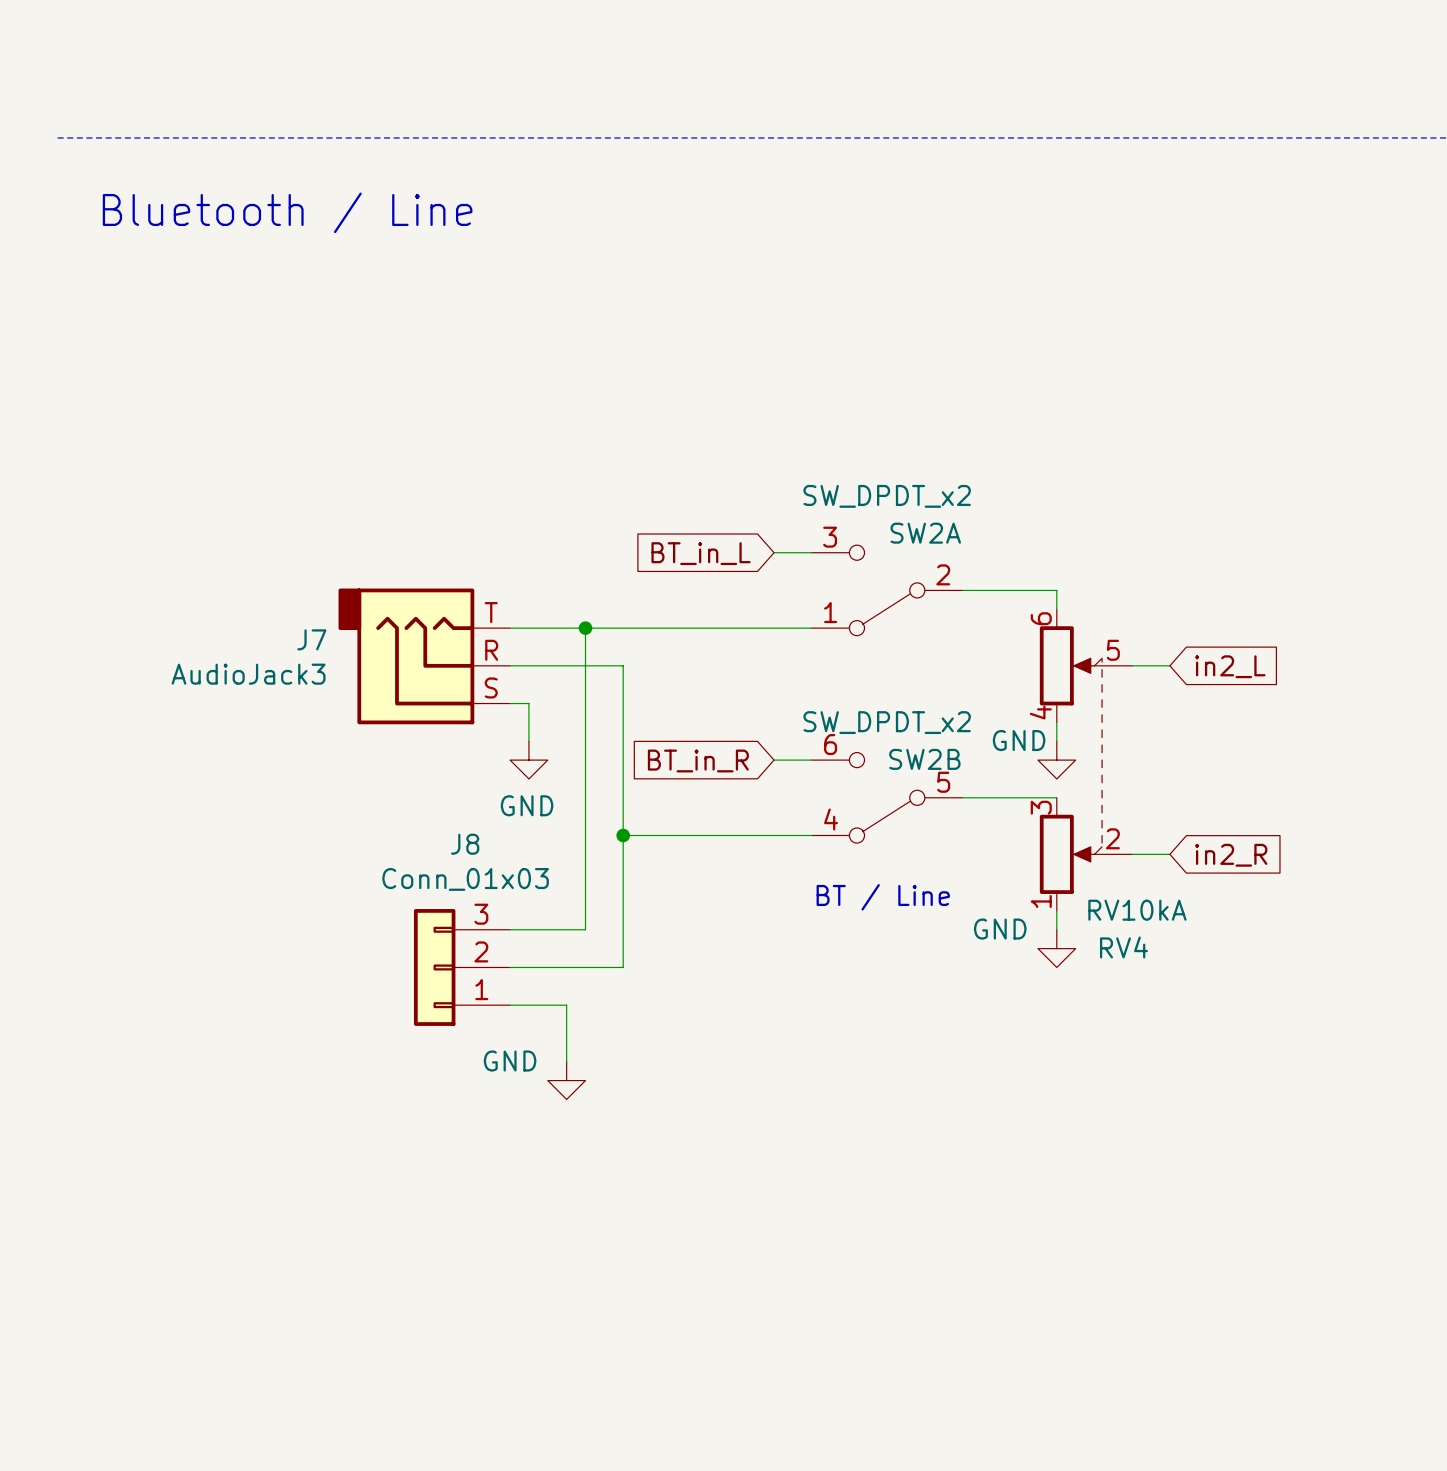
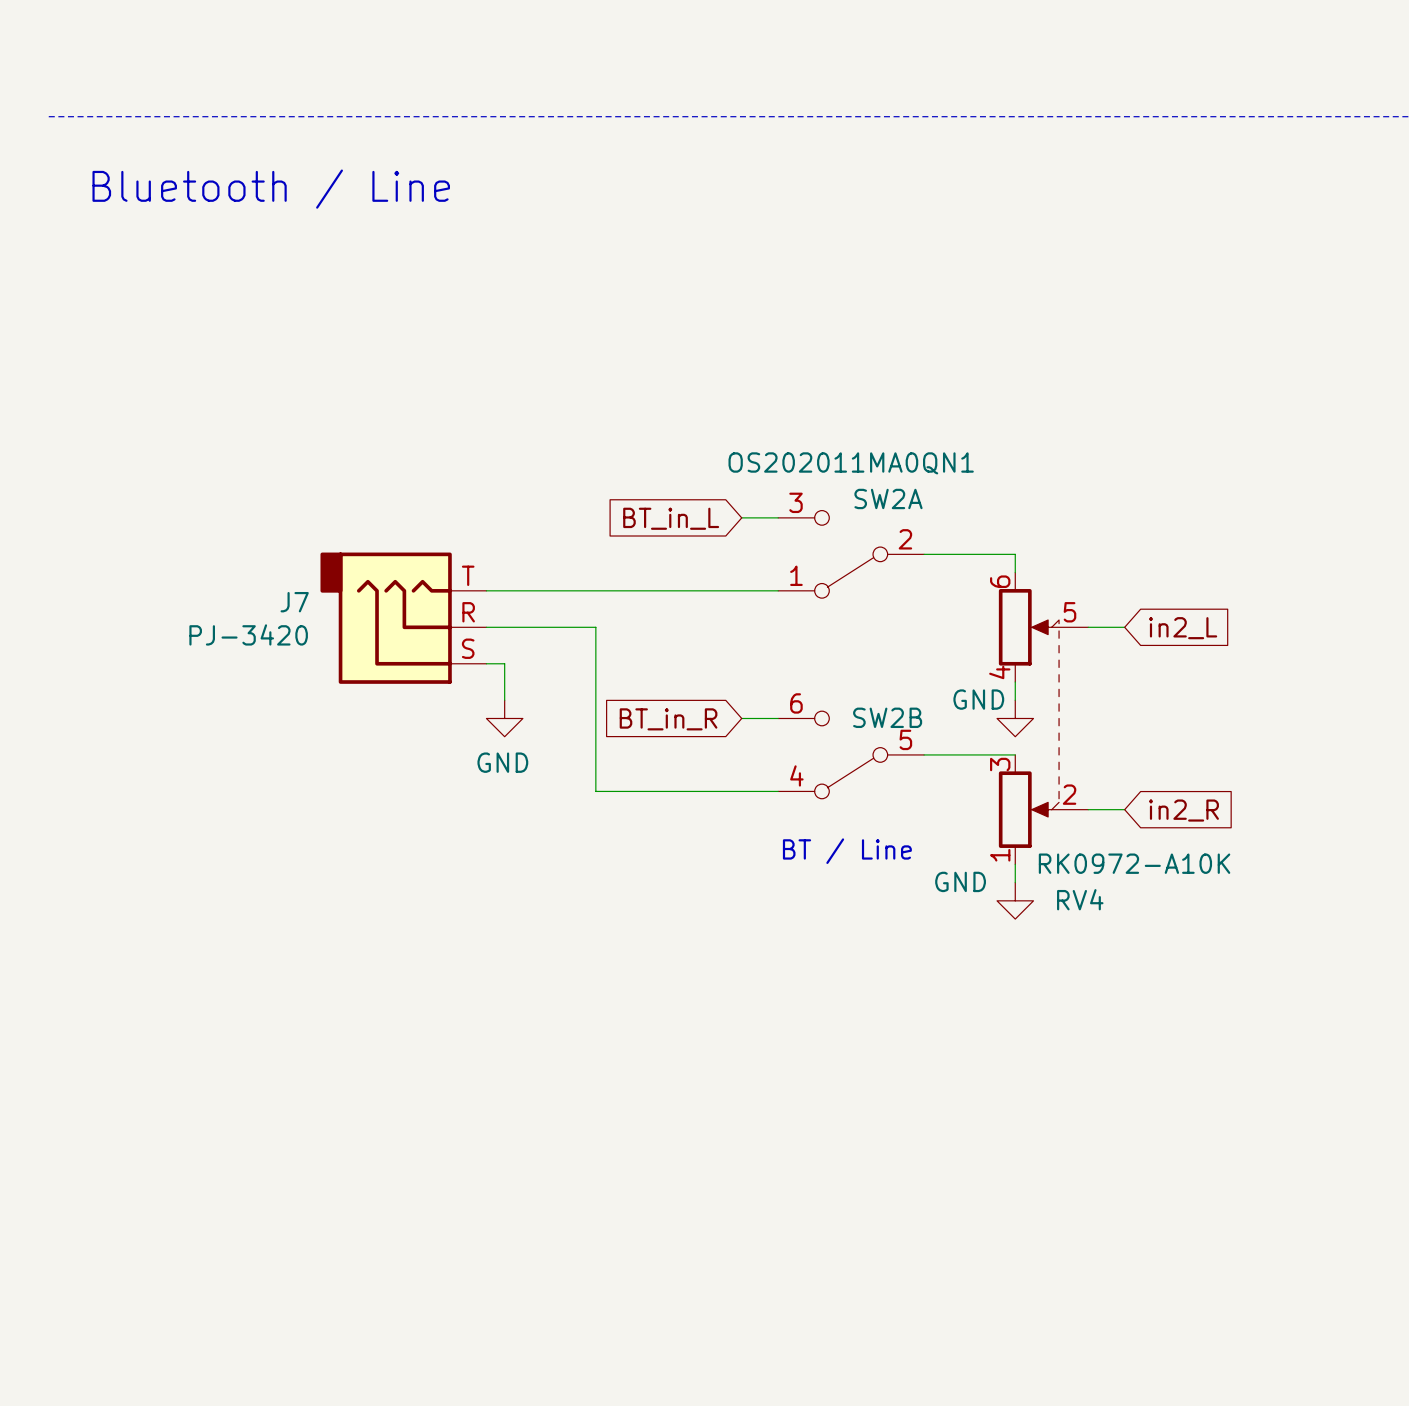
SW2A value: SW_DPDT_x2 (887, 496) -> OS202011MA0QN1 (851, 463)
wire: (585, 628) (585, 929) (510, 929) -> none
junction: (585, 628) -> none
J7 value: AudioJack3 (248, 674) -> PJ-3420 (248, 634)
SW2B value: SW_DPDT_x2 (887, 722) -> none
wire: (623, 835) (623, 967) (510, 967) -> none
junction: (623, 835) -> none
RV4 value: RV10kA (1137, 910) -> RK0972-A10K (1134, 863)
J8: Conn_01x03 (462, 967) -> none
wire: (510, 1005) (566, 1005) (566, 1061) -> none
power symbol: GND (566, 1080) -> none

